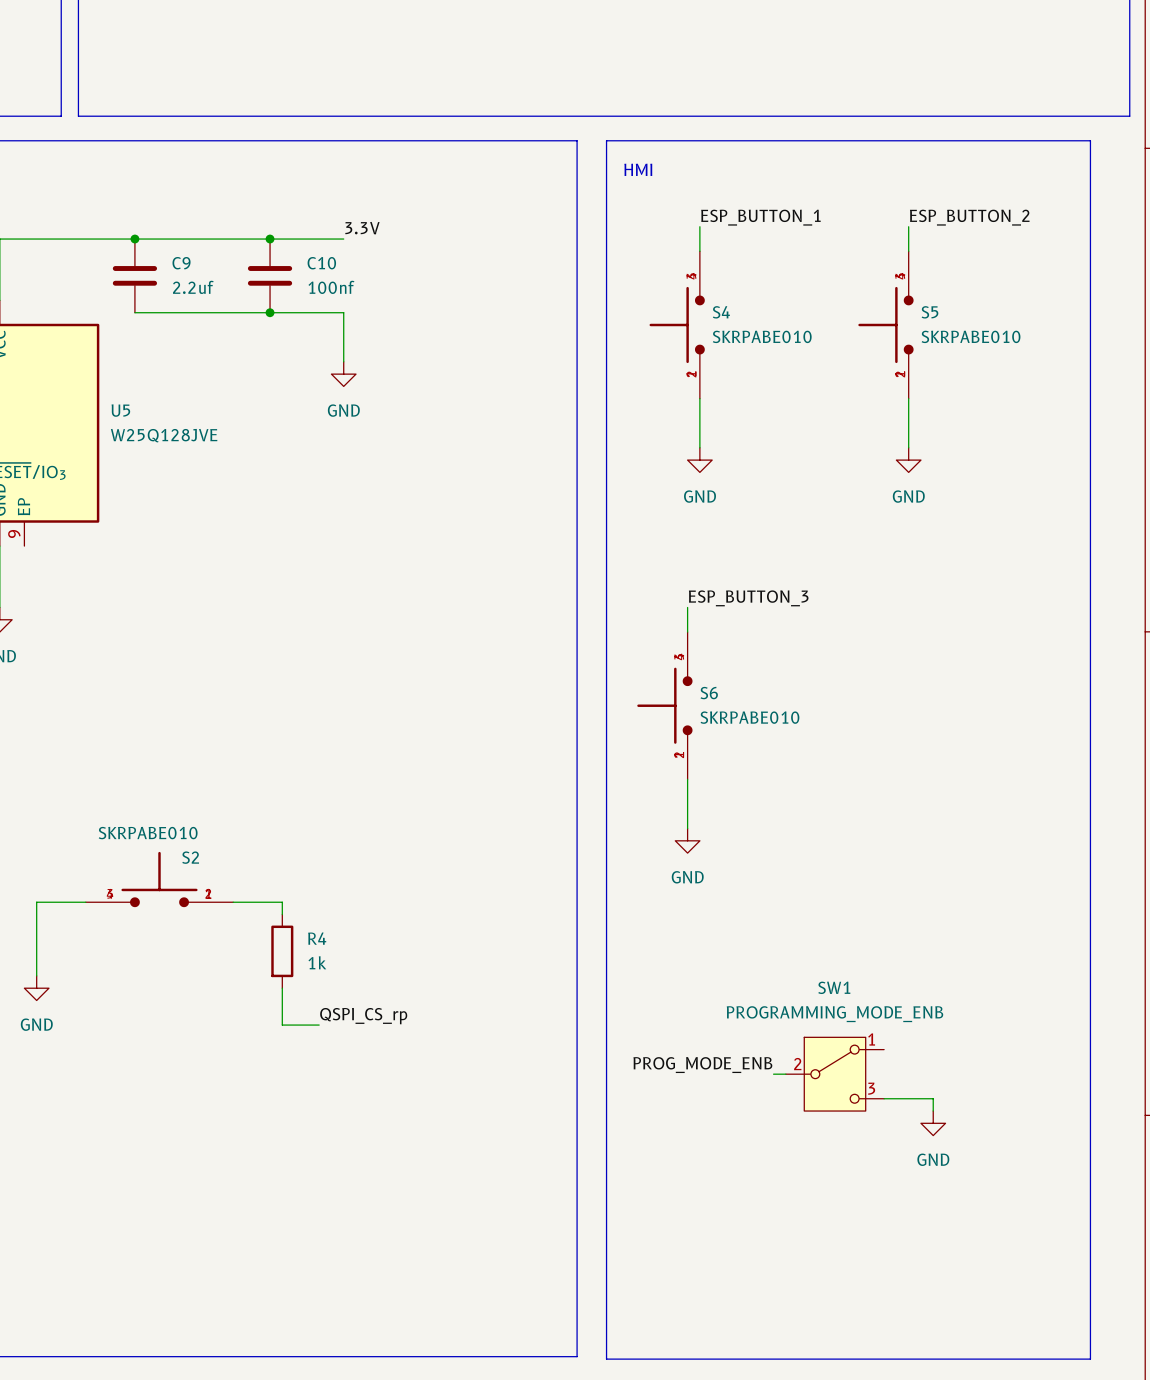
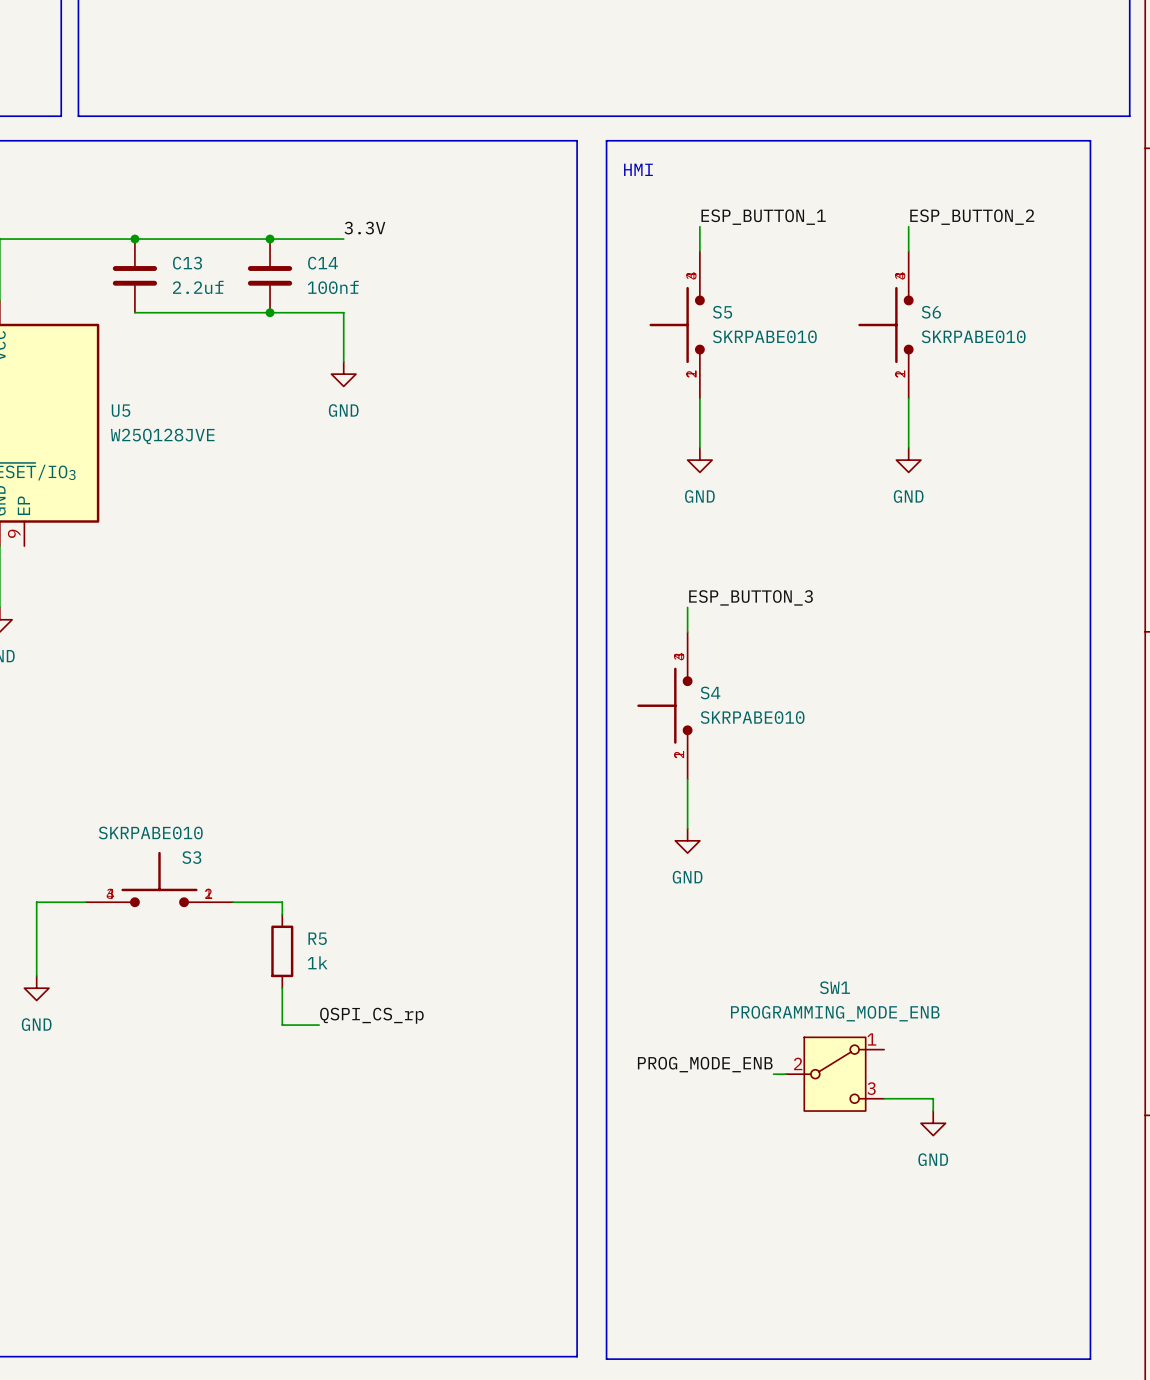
C9 name: C9 (181, 263) -> C13 (187, 263)
C10 name: C10 (321, 263) -> C14 (322, 263)
S4 name: S4 (721, 312) -> S5 (722, 312)
S5 name: S5 (929, 312) -> S6 (931, 312)
S6 name: S6 (709, 693) -> S4 (710, 692)
S2 name: S2 (190, 857) -> S3 (191, 857)
R4 name: R4 (317, 938) -> R5 (317, 938)

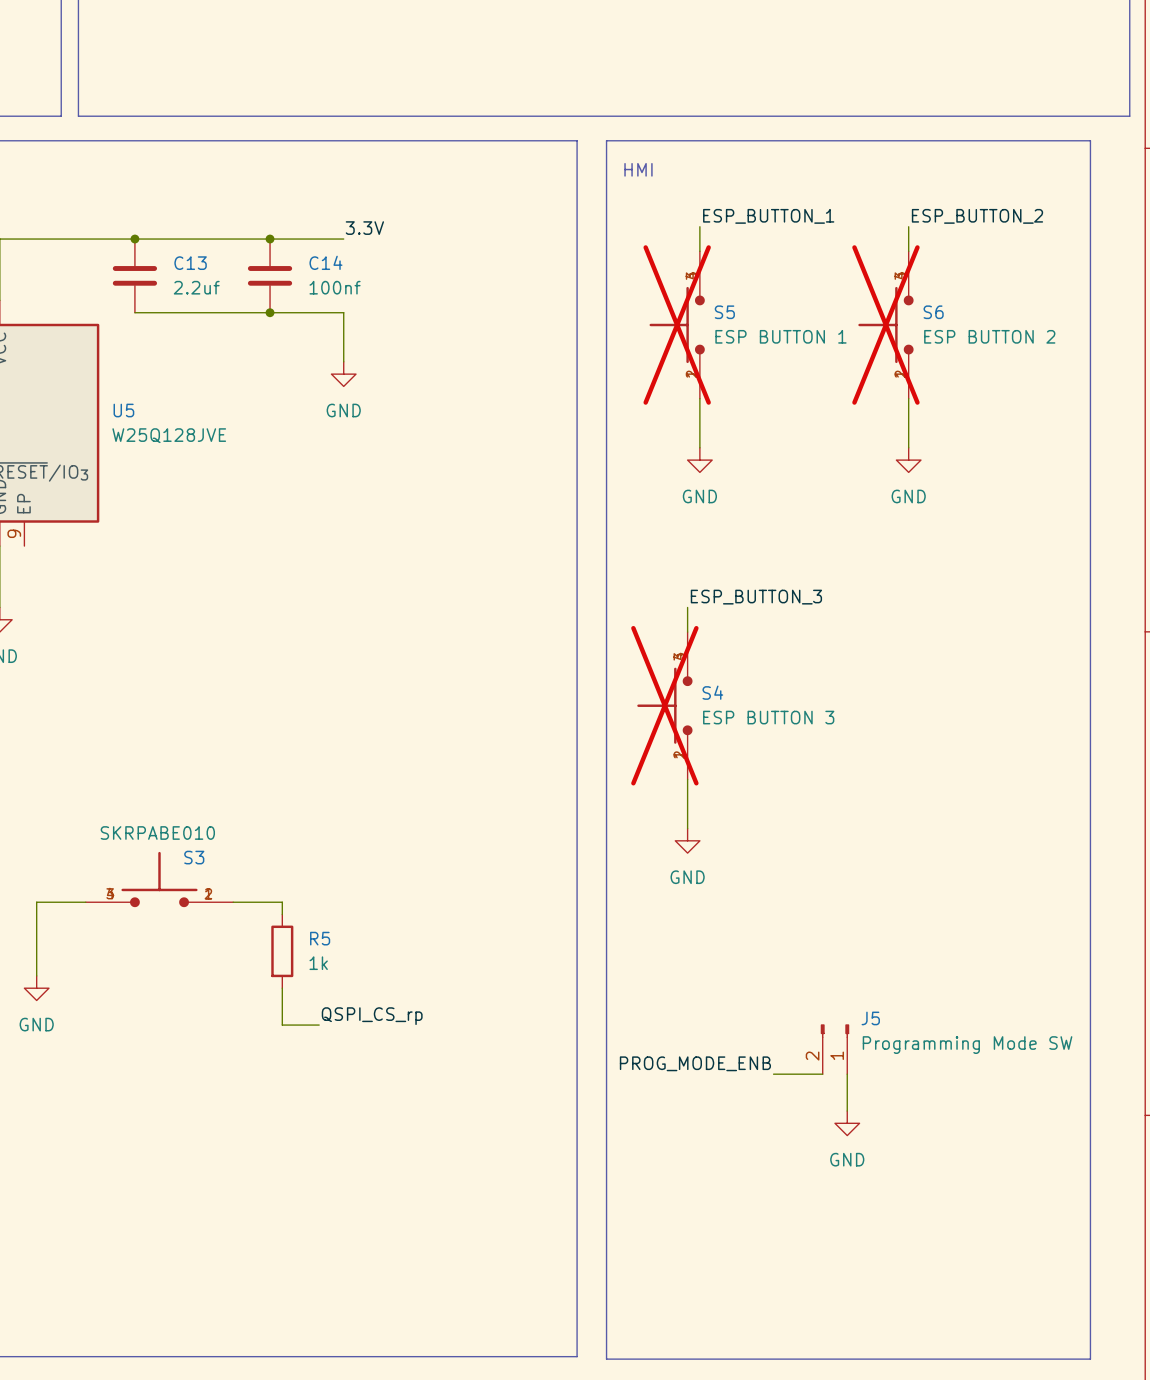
S5 do-not-place cross: none -> (677, 325)
S6 do-not-place cross: none -> (885, 325)
S5 value: SKRPABE010 (764, 336) -> ESP BUTTON 1 (780, 336)
S6 value: SKRPABE010 (973, 336) -> ESP BUTTON 2 (989, 336)
S4 do-not-place cross: none -> (664, 705)
S4 value: SKRPABE010 (752, 717) -> ESP BUTTON 3 (768, 717)
J5: none -> Programming Mode SW (834, 1049)
SW1: PROGRAMMING_MODE_ENB (834, 1074) -> none
wire: (884, 1098) (933, 1098) (933, 1111) -> none
power symbol position: GND (933, 1123) -> GND (847, 1123)

